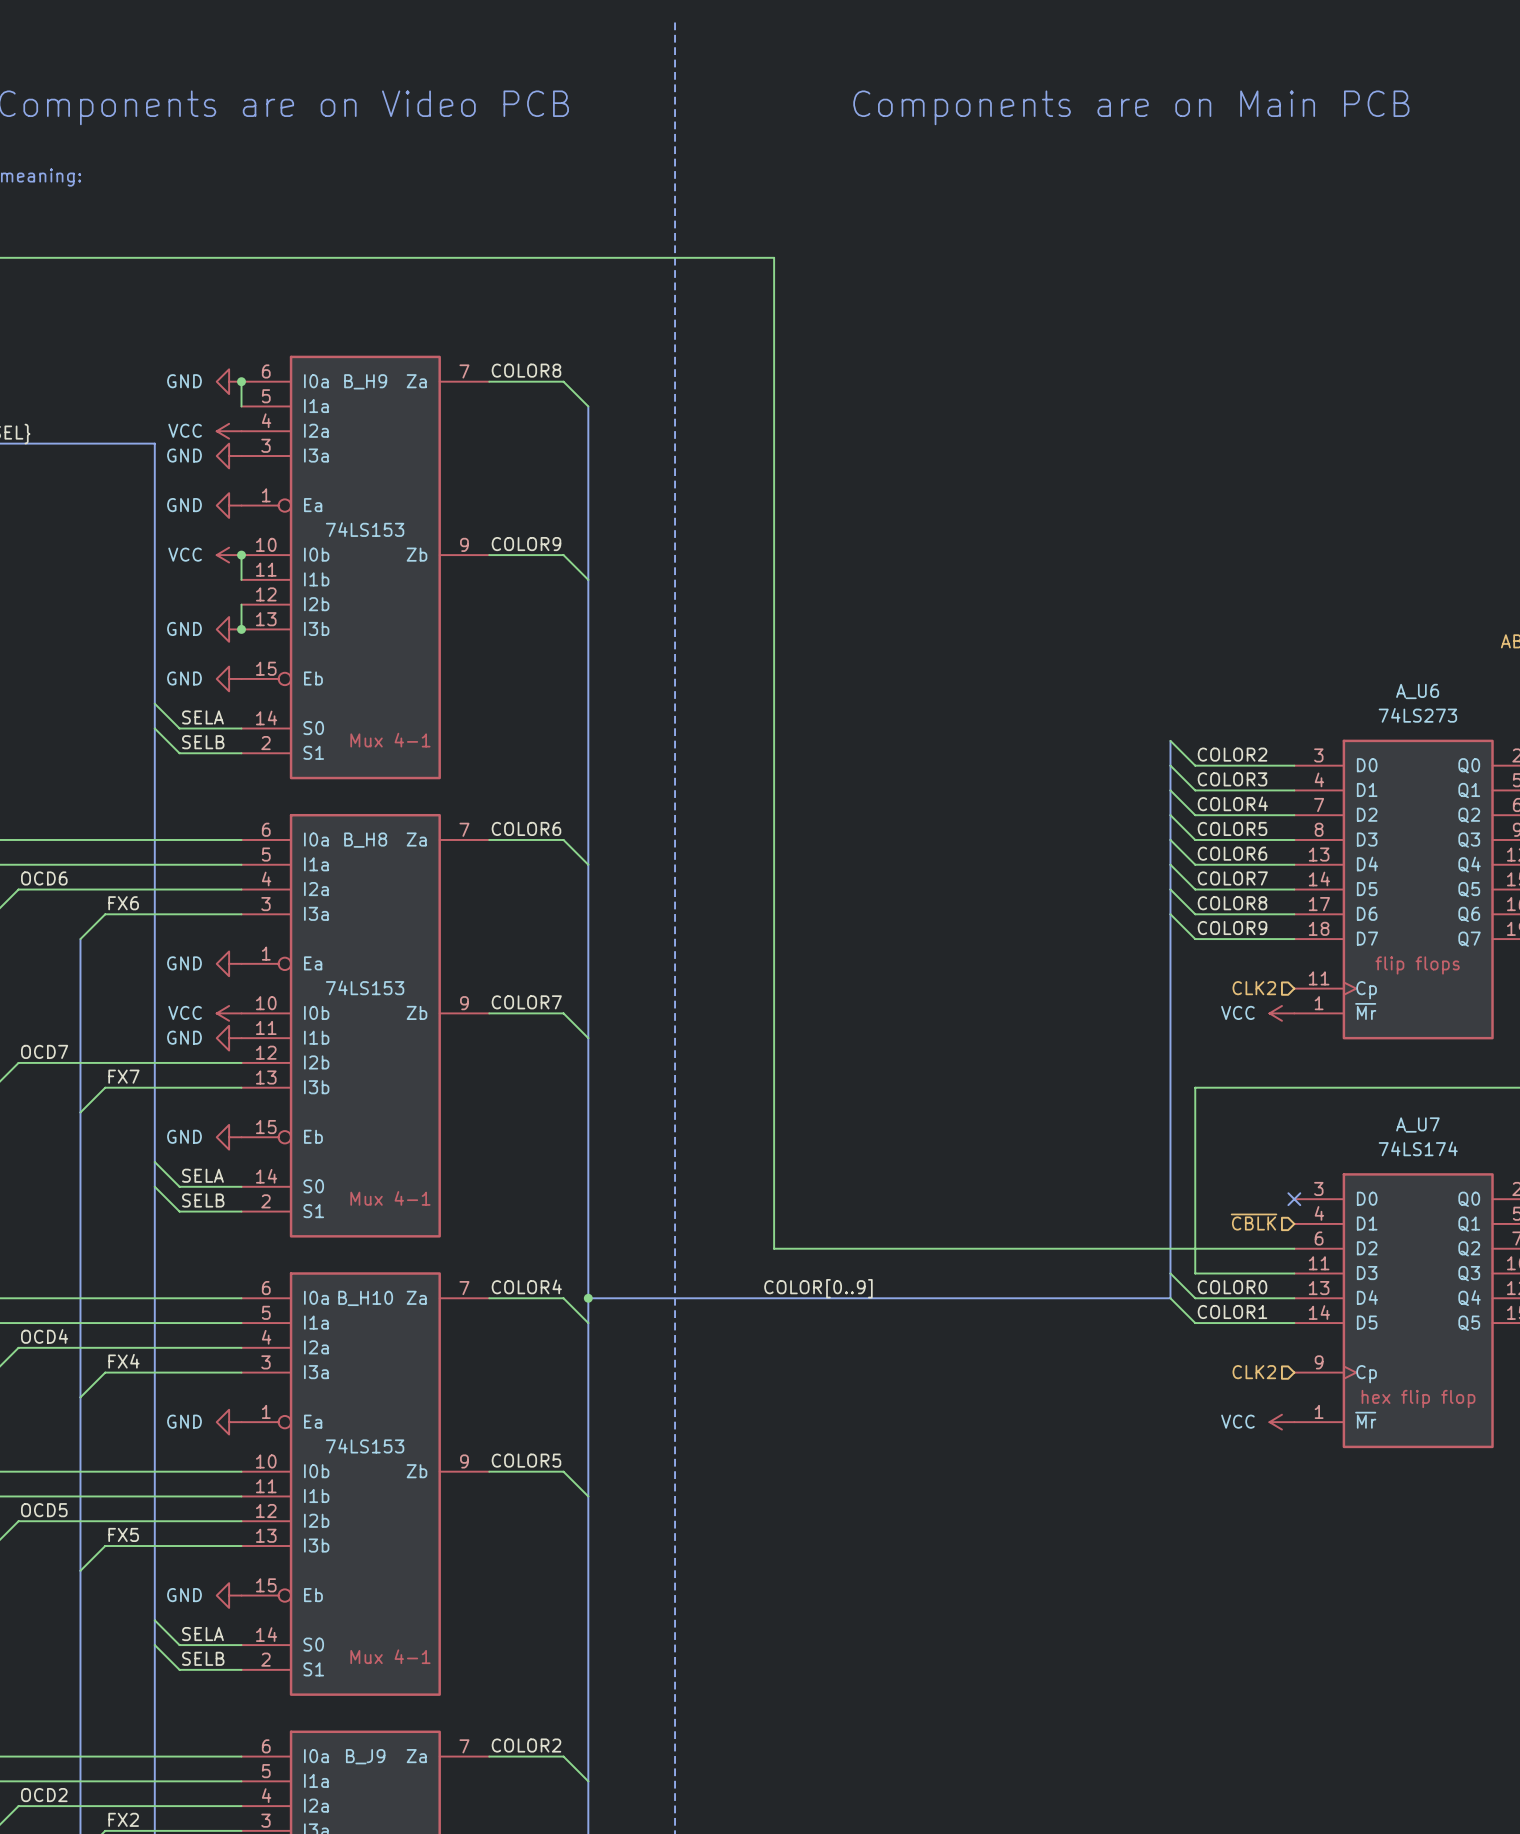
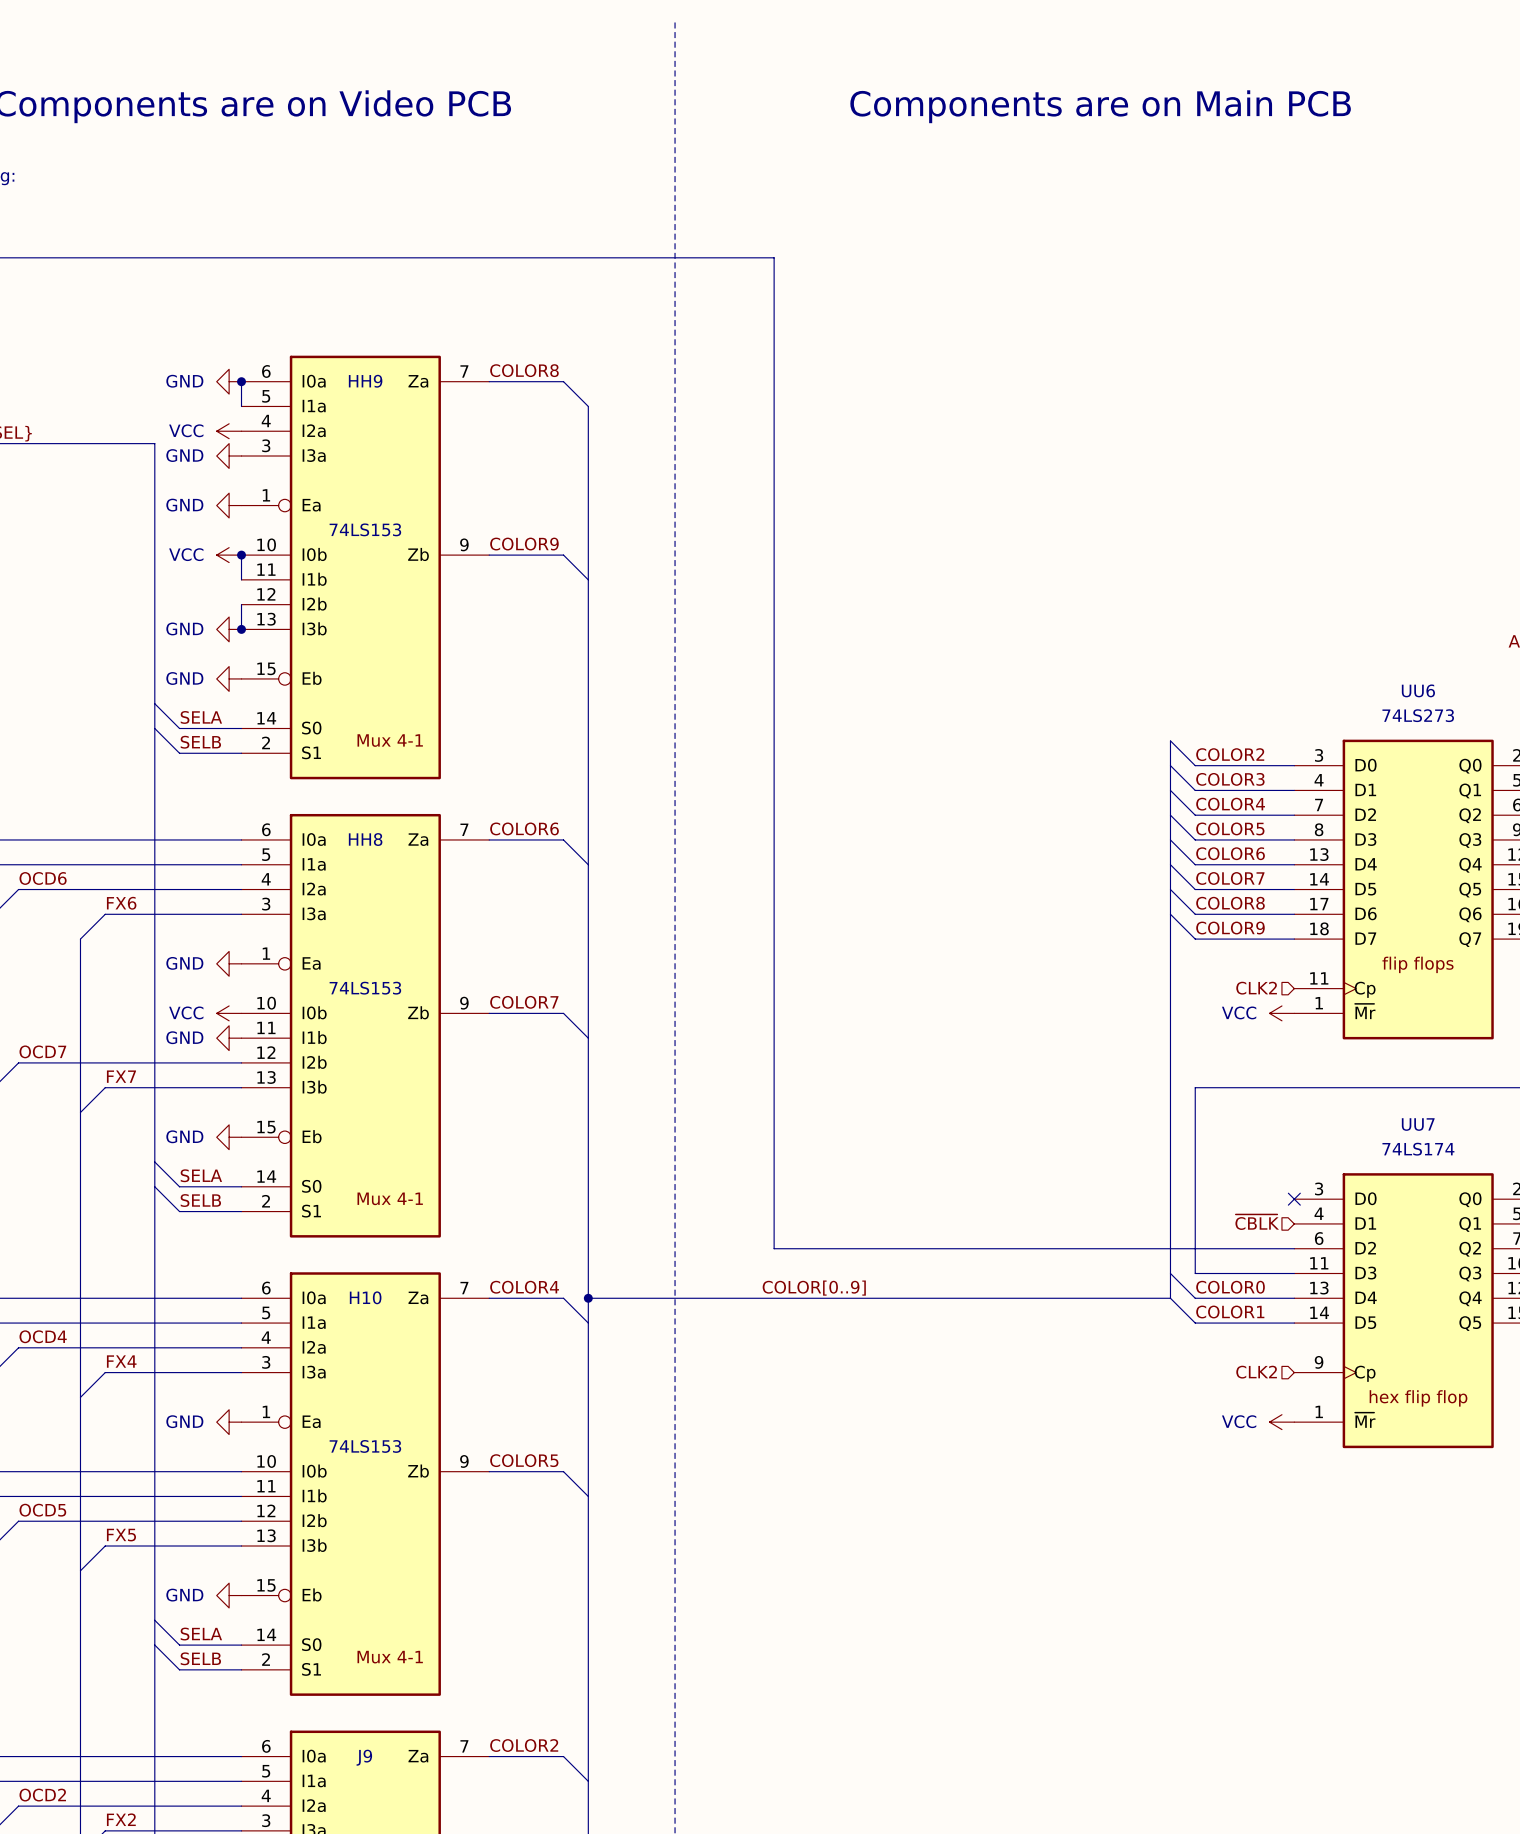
B_H9 name: B_H9 (365, 381) -> HH9 (365, 381)
A_U6 name: A_U6 (1417, 691) -> UU6 (1418, 690)
B_H8 name: B_H8 (365, 840) -> HH8 (365, 839)
A_U7 name: A_U7 (1417, 1124) -> UU7 (1418, 1124)
B_H10 name: B_H10 (365, 1298) -> H10 (365, 1297)
B_J9 name: B_J9 (365, 1756) -> J9 (364, 1757)

